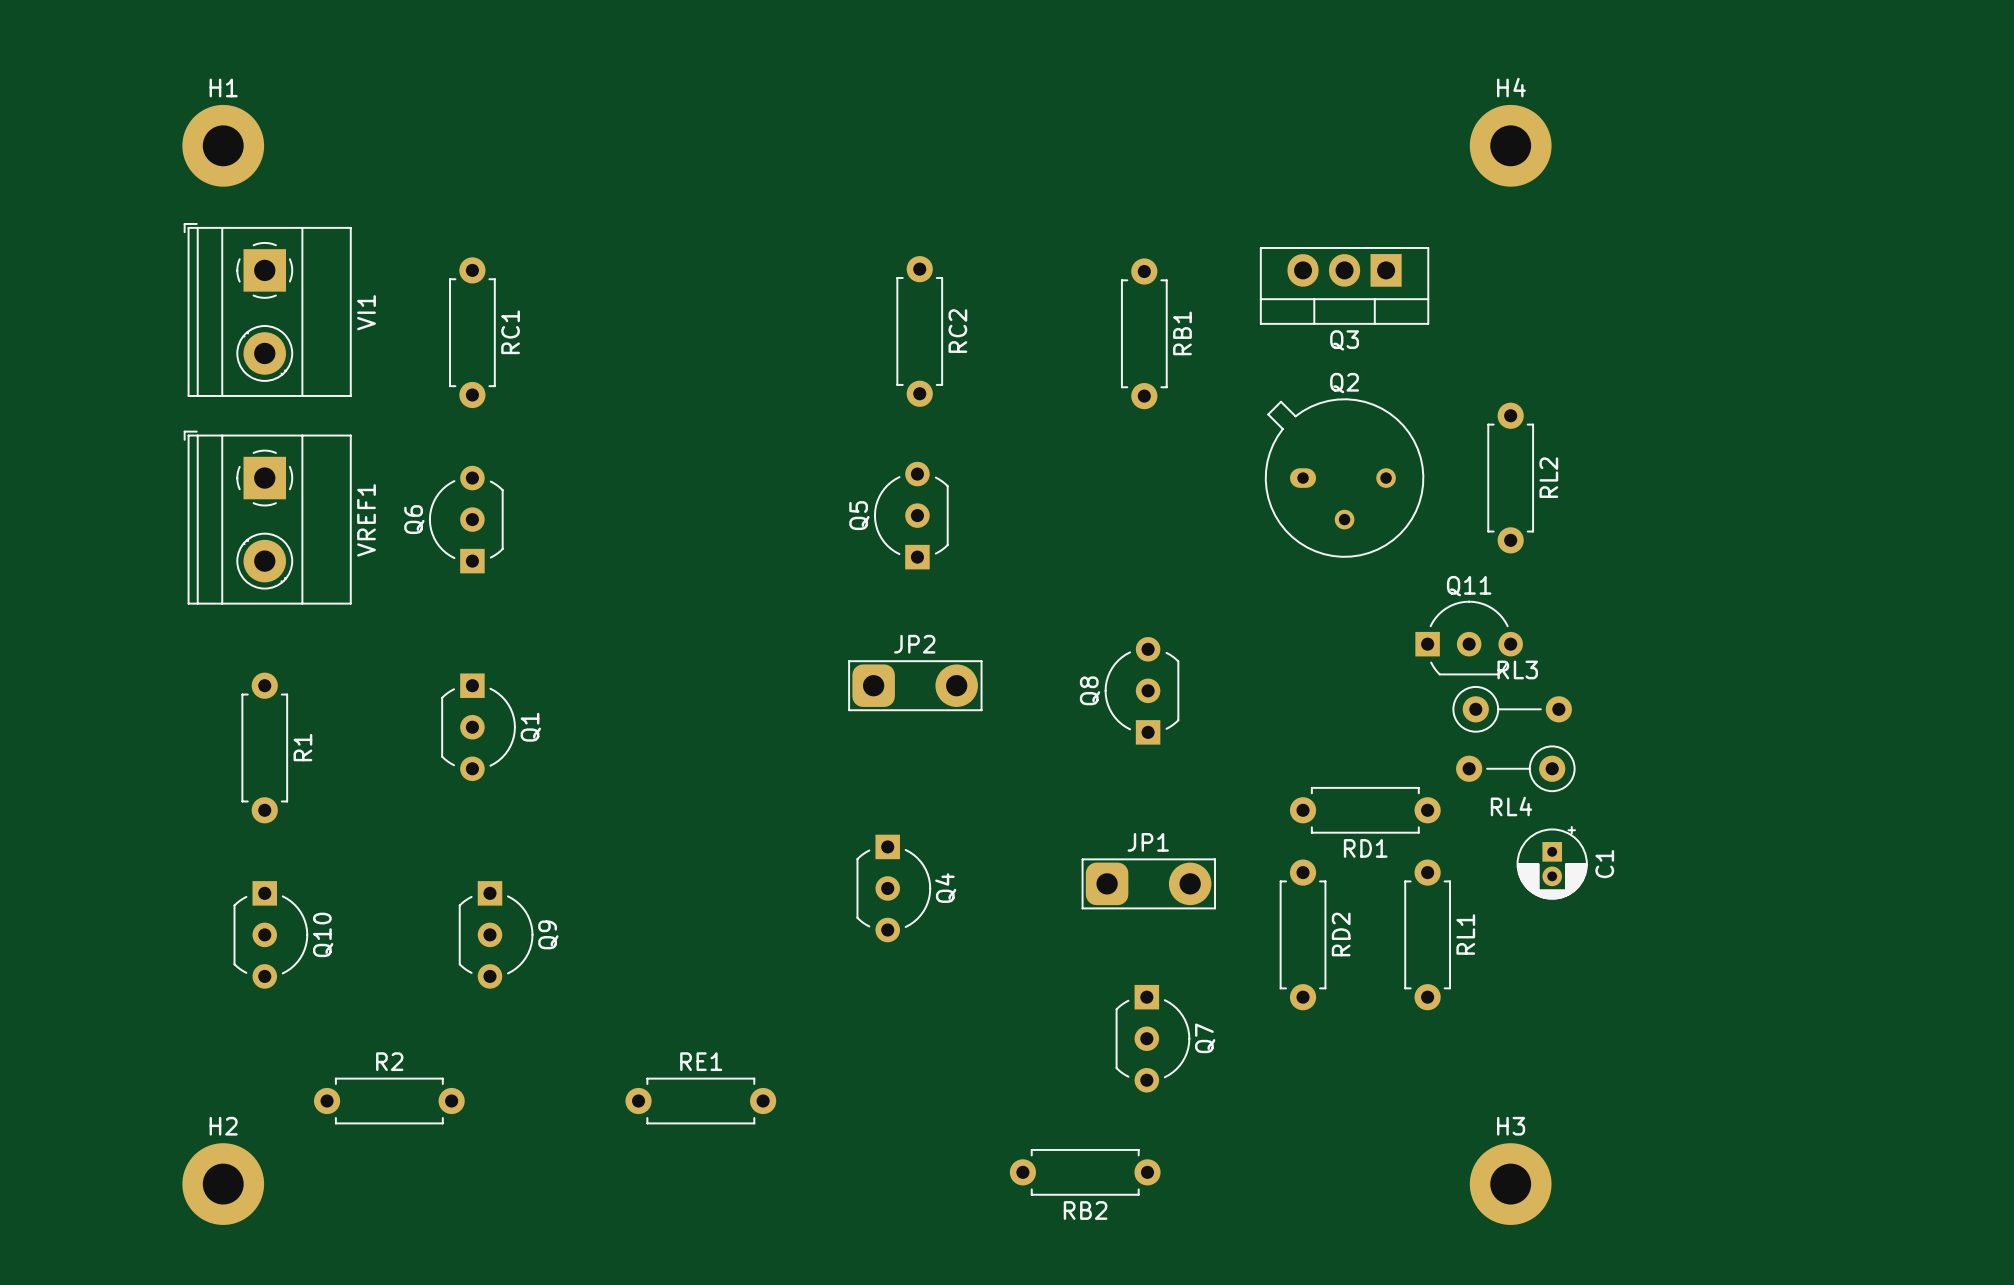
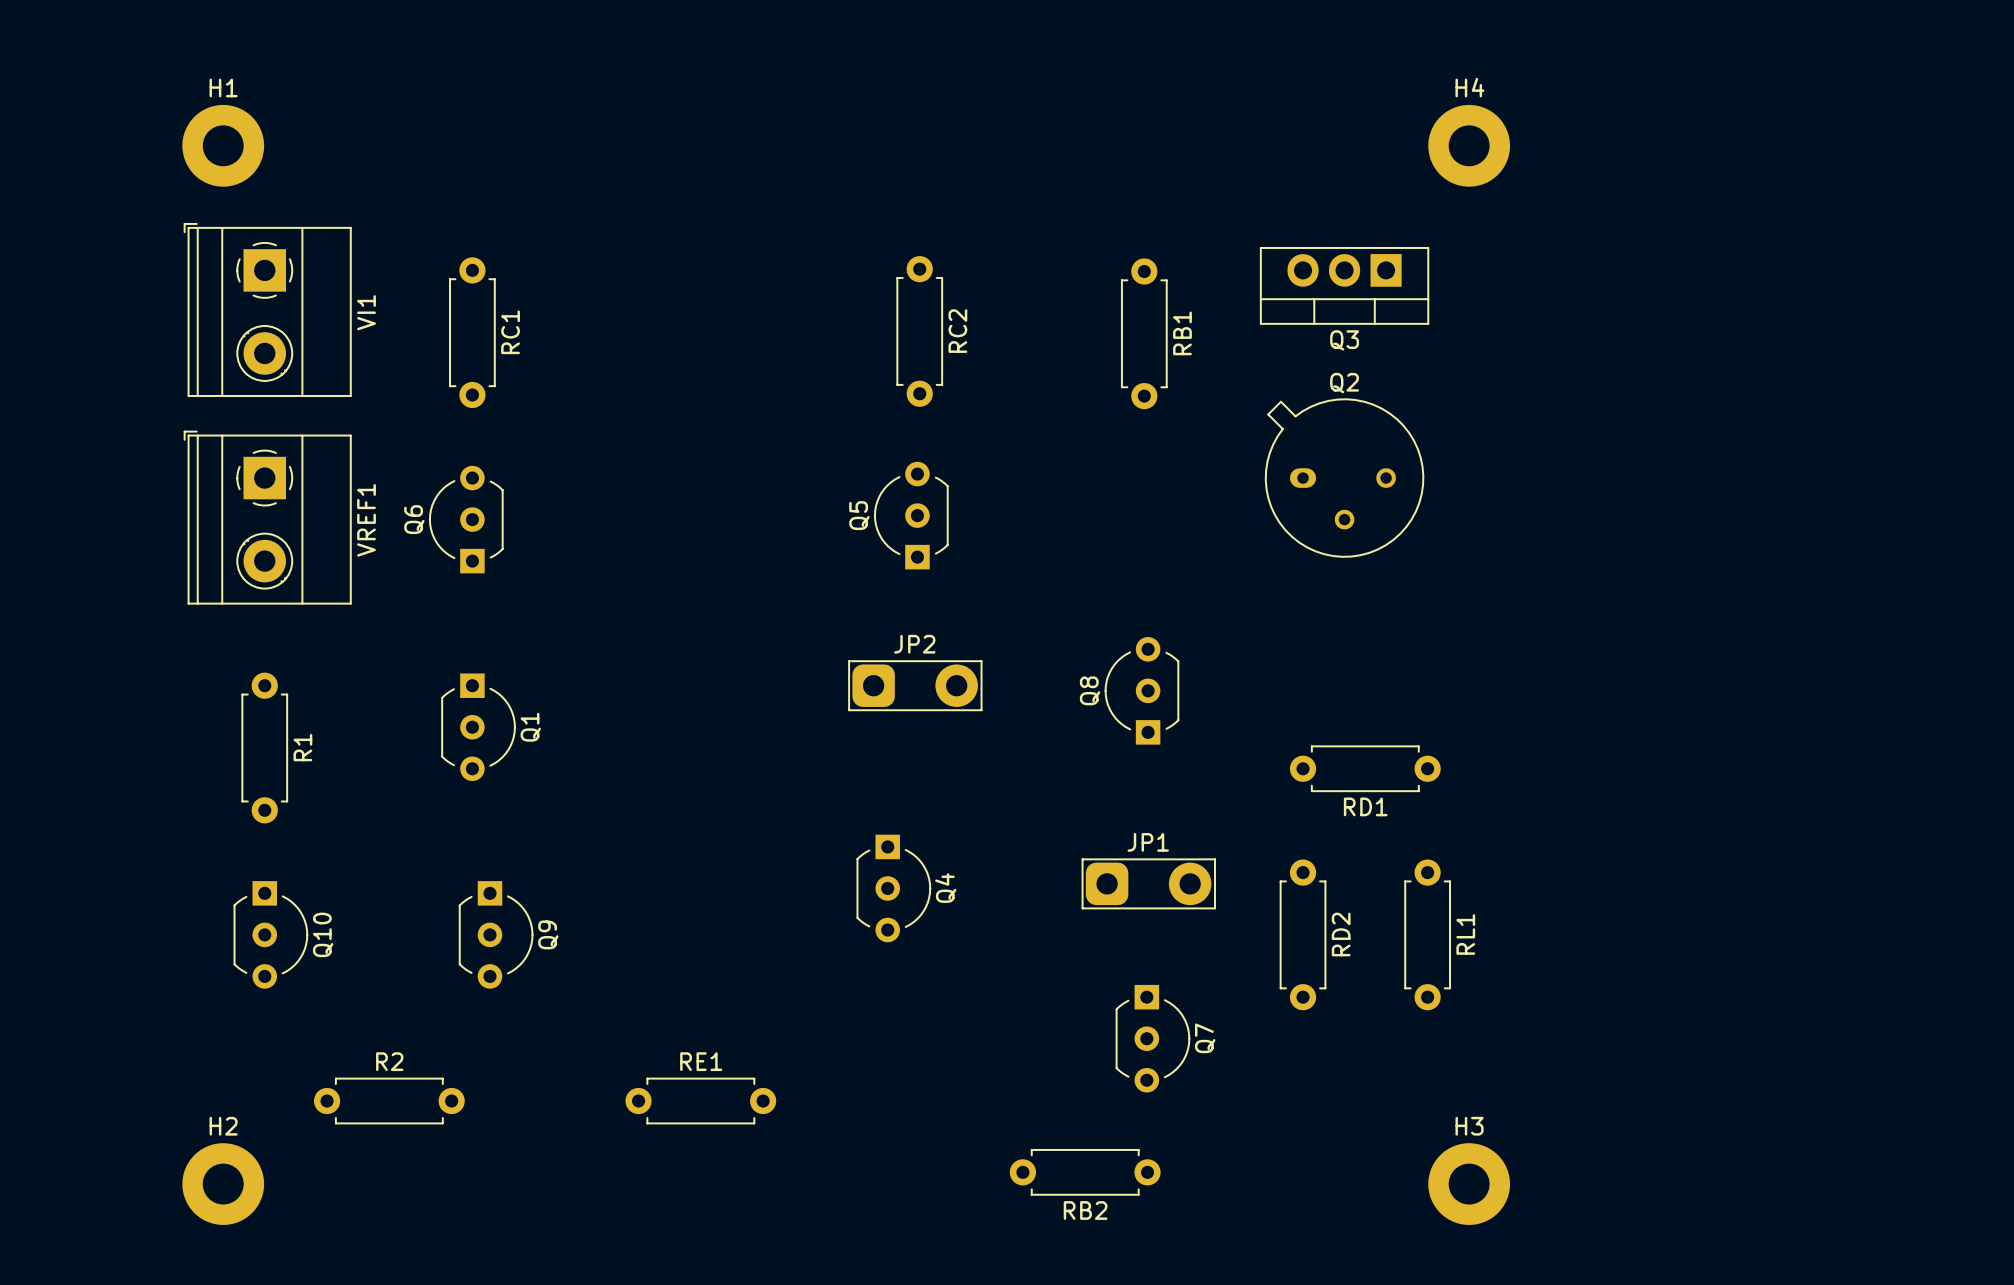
H4 position: (1510, 145) -> (1469, 145)
RL2: (1510, 478) -> none
Q11: (1469, 638) -> none
RL3: (1512, 709) -> none
RL4: (1515, 768) -> none
RD1 position: (1365, 810) -> (1365, 768)
C1: (1552, 862) -> none
H3 position: (1510, 1184) -> (1469, 1184)

